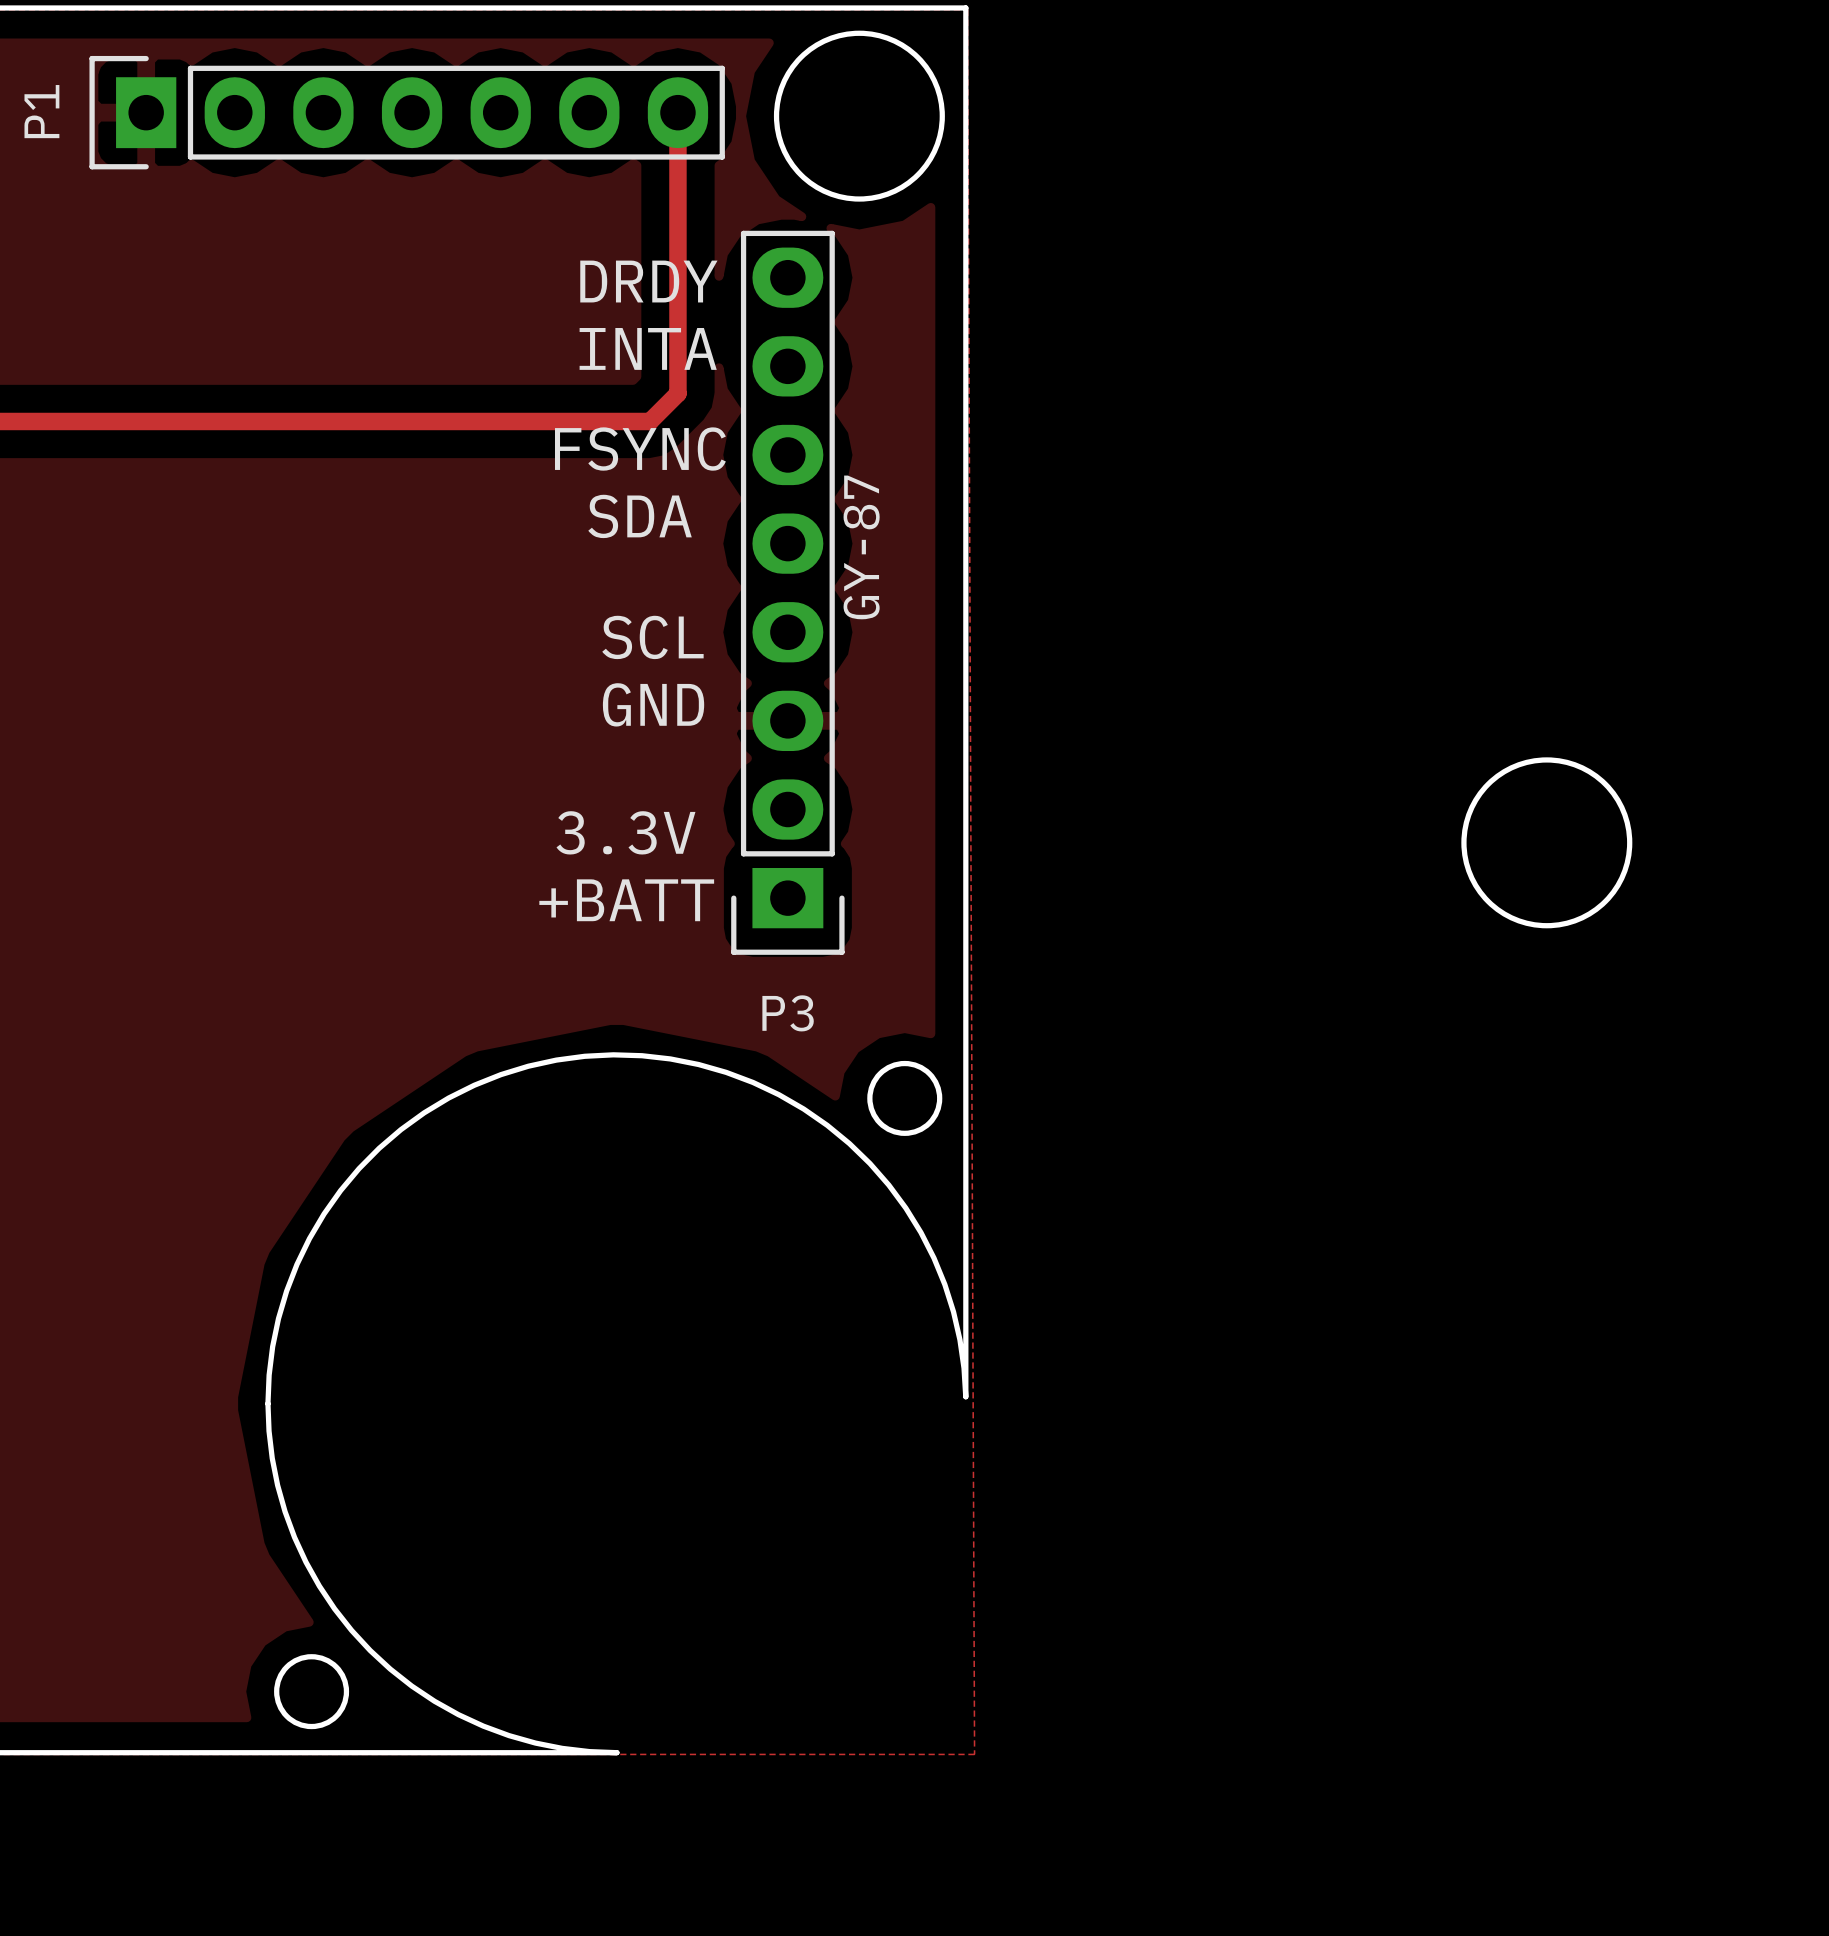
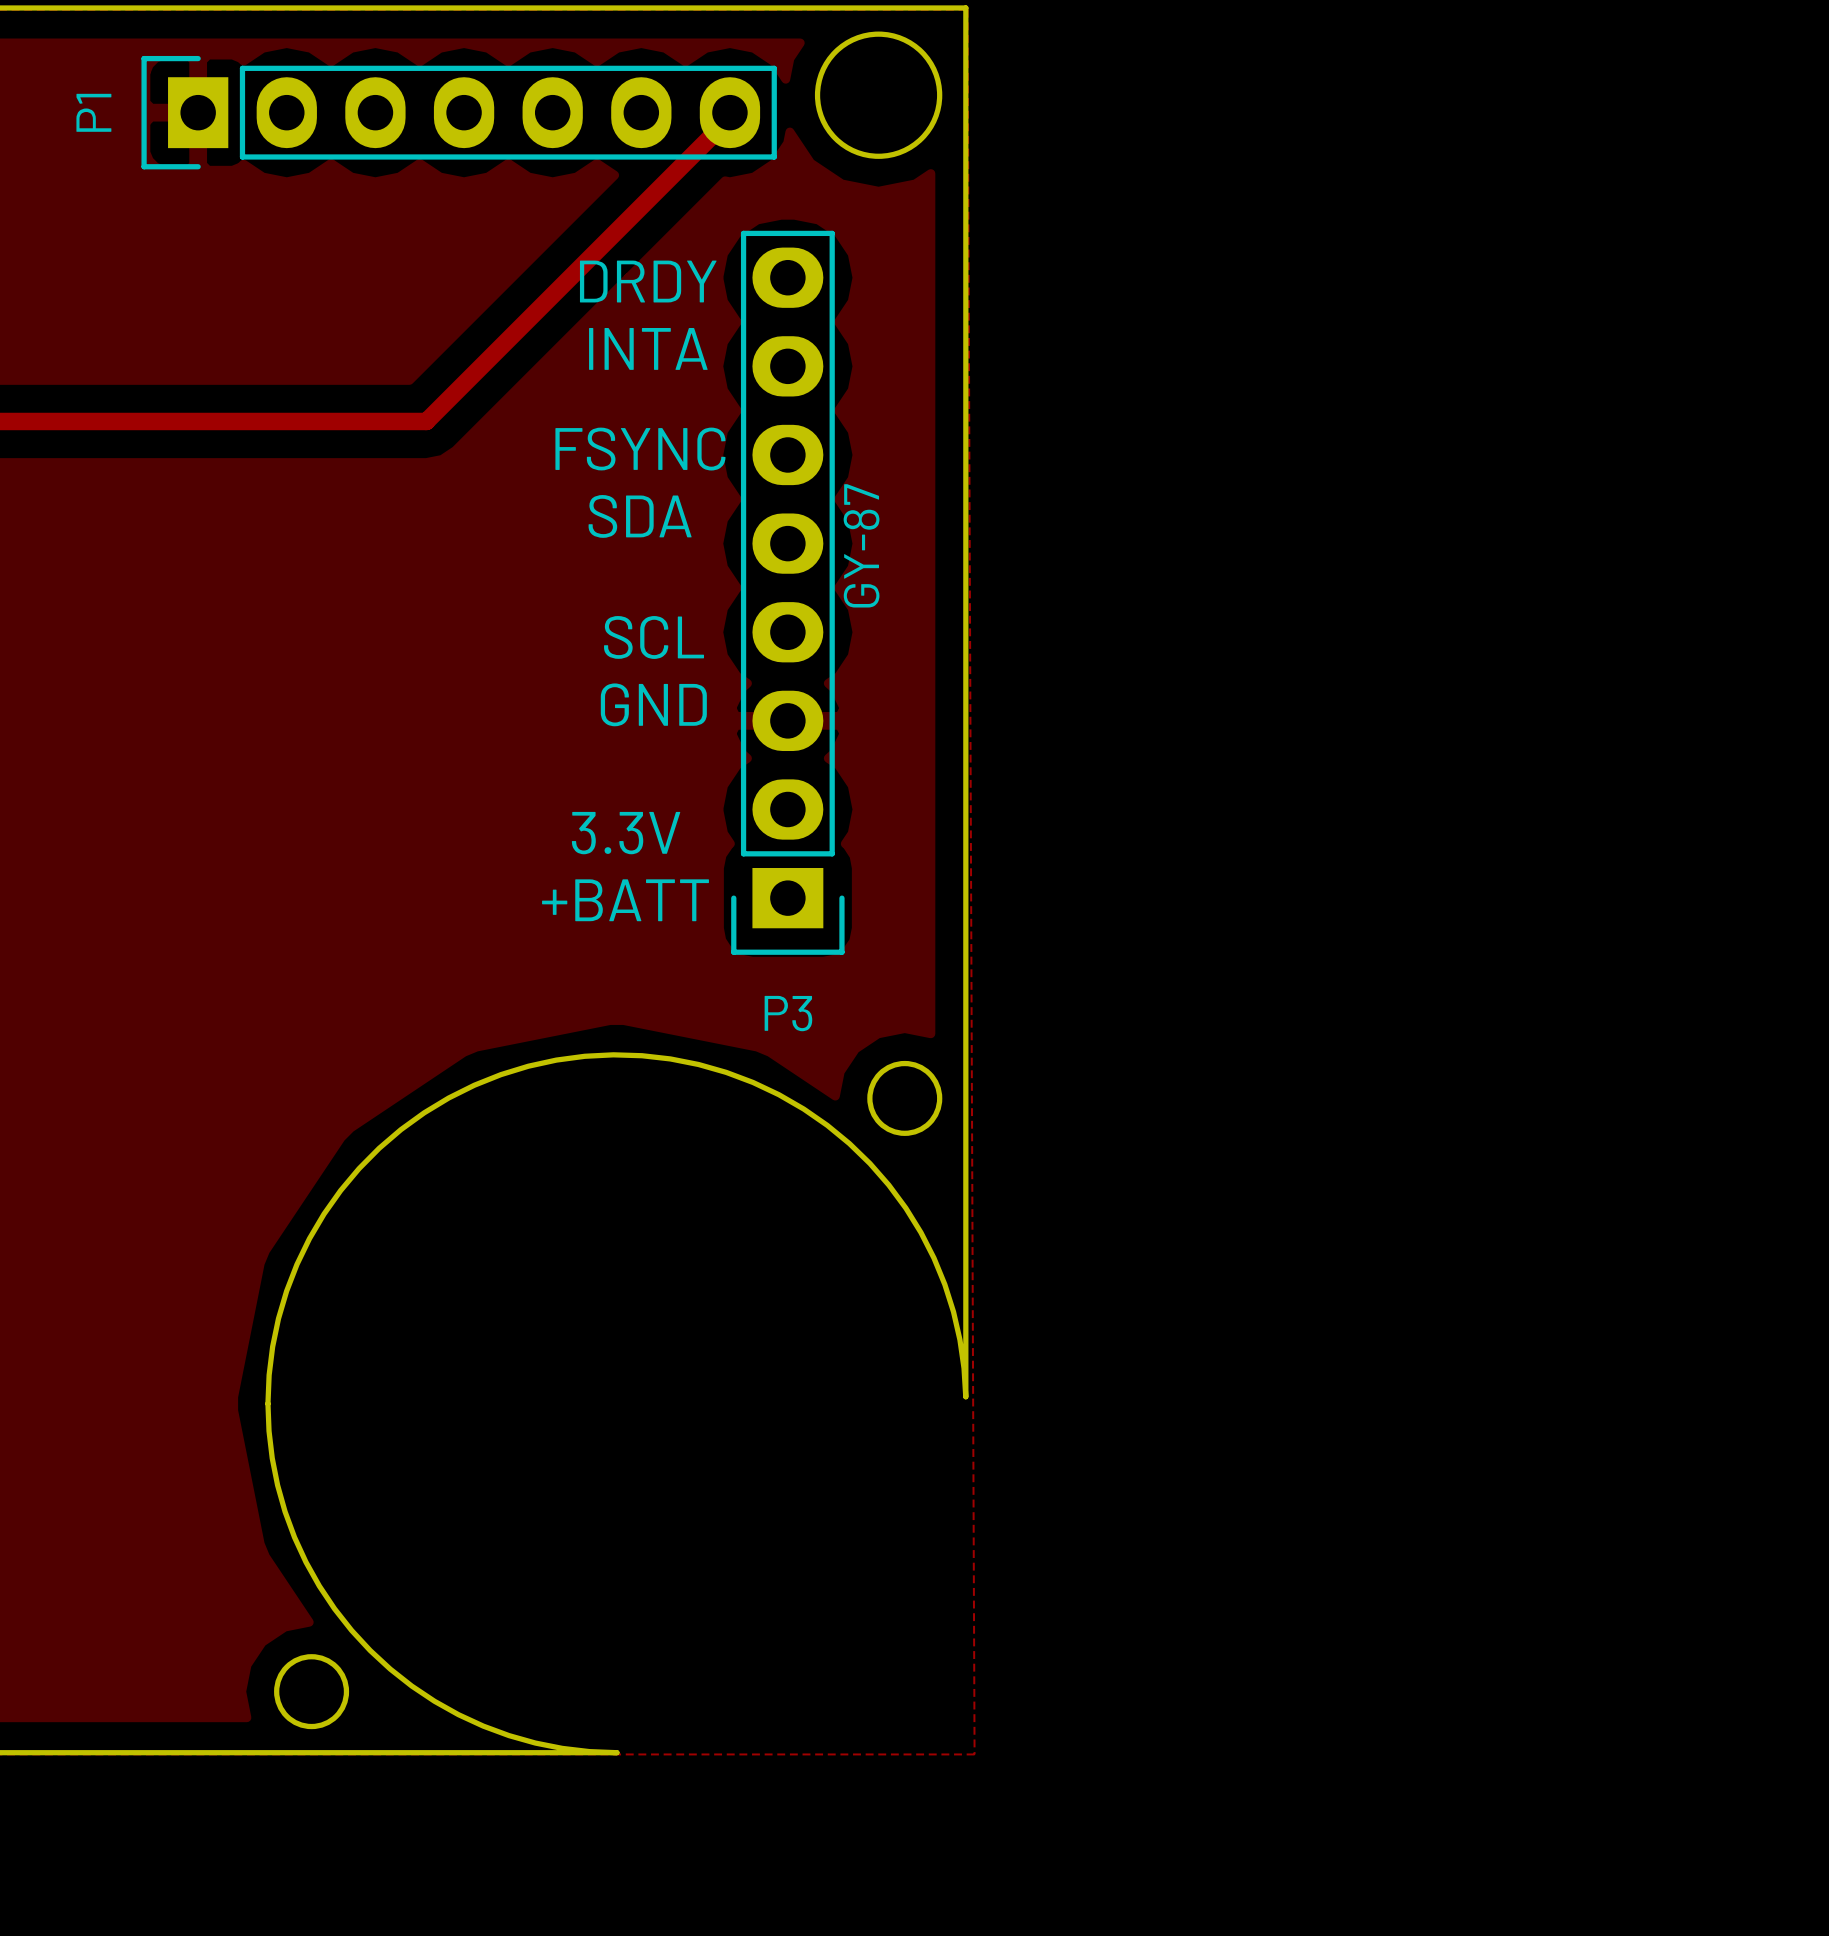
round board edge size: [773, 30, 945, 202] -> [814, 31, 943, 159]
P1 position: (407, 112) -> (459, 112)
track: (677, 112) (677, 393) (650, 421) (426, 421) -> (729, 107) (729, 117) (426, 421)
round board edge: [1461, 757, 1633, 929] -> none

